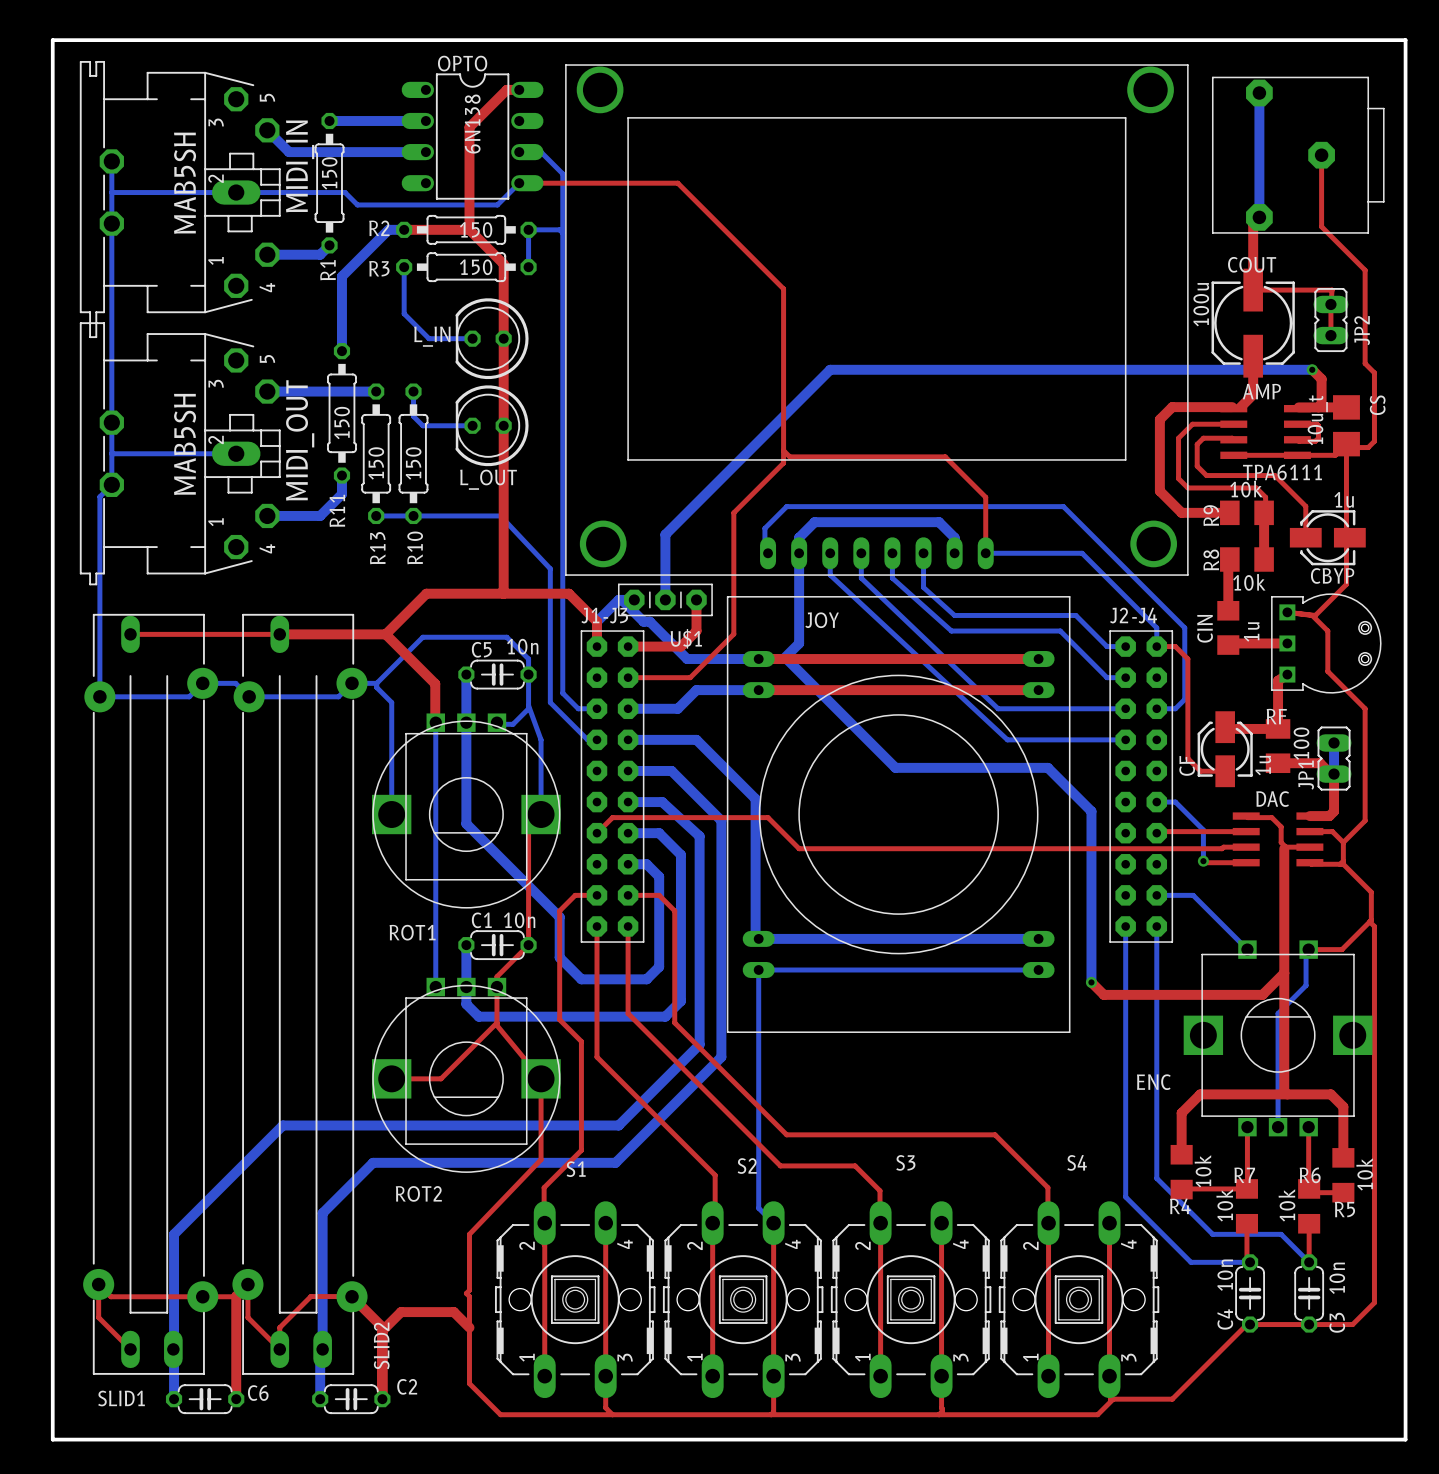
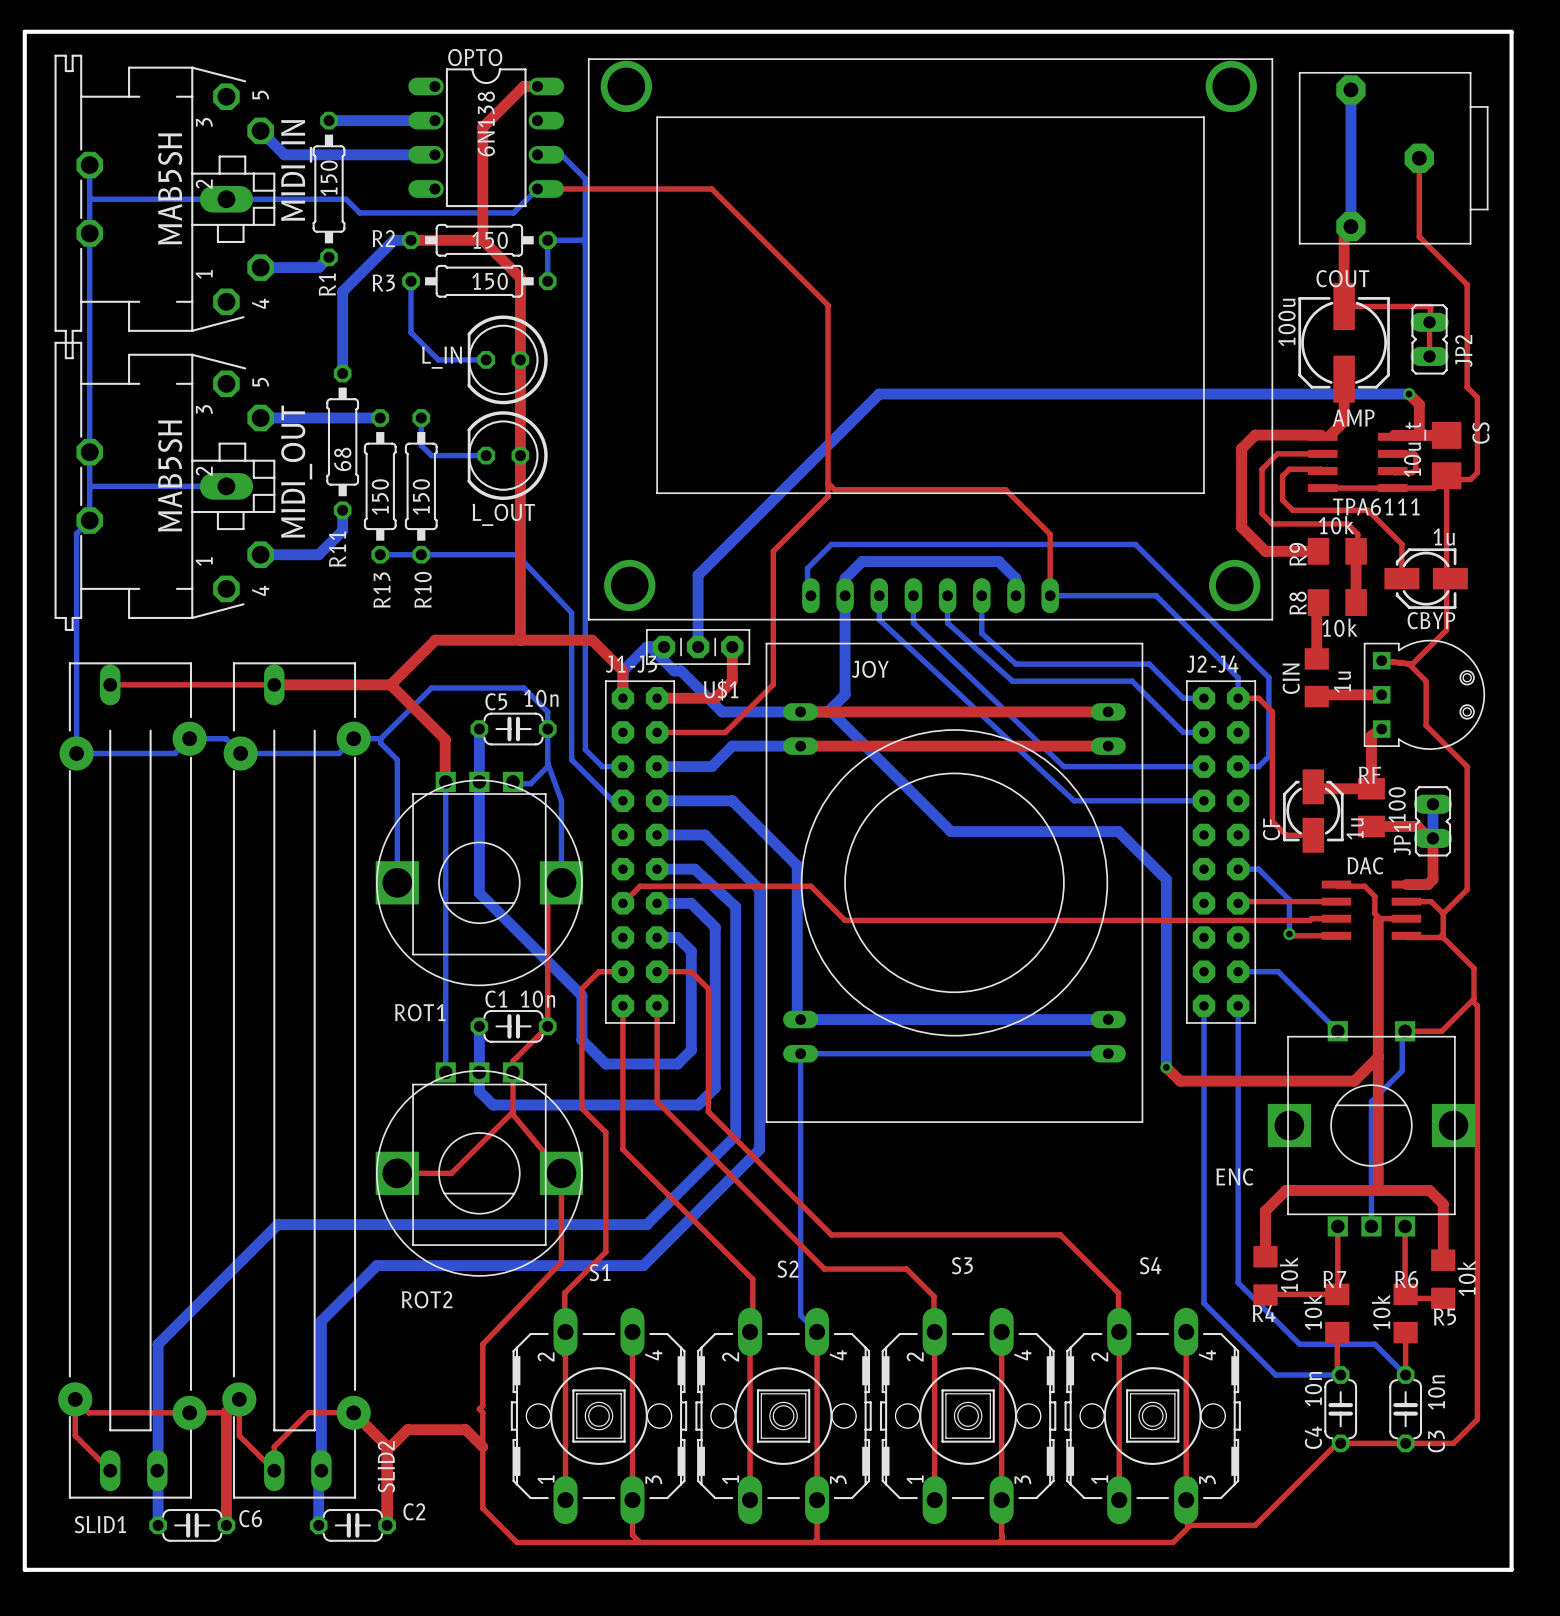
R11 value: 150 (342, 423) -> 68 (342, 459)

